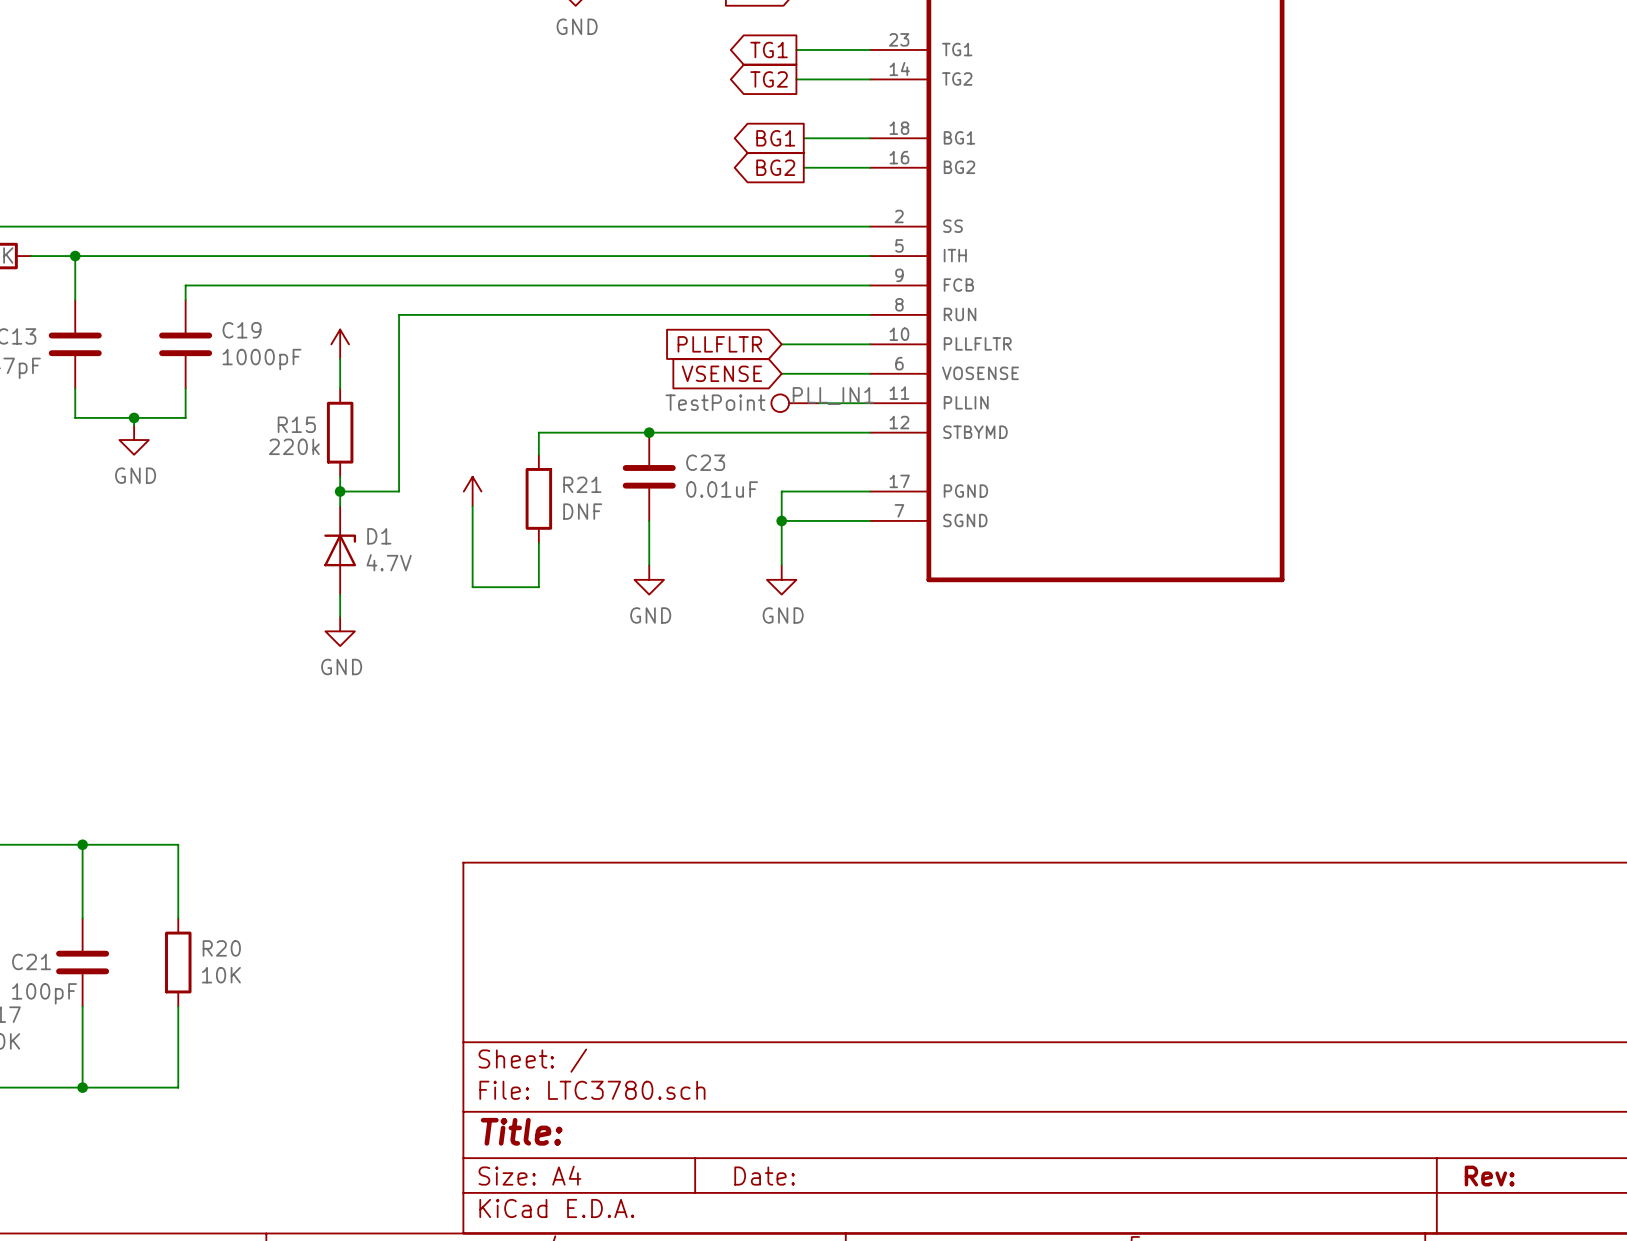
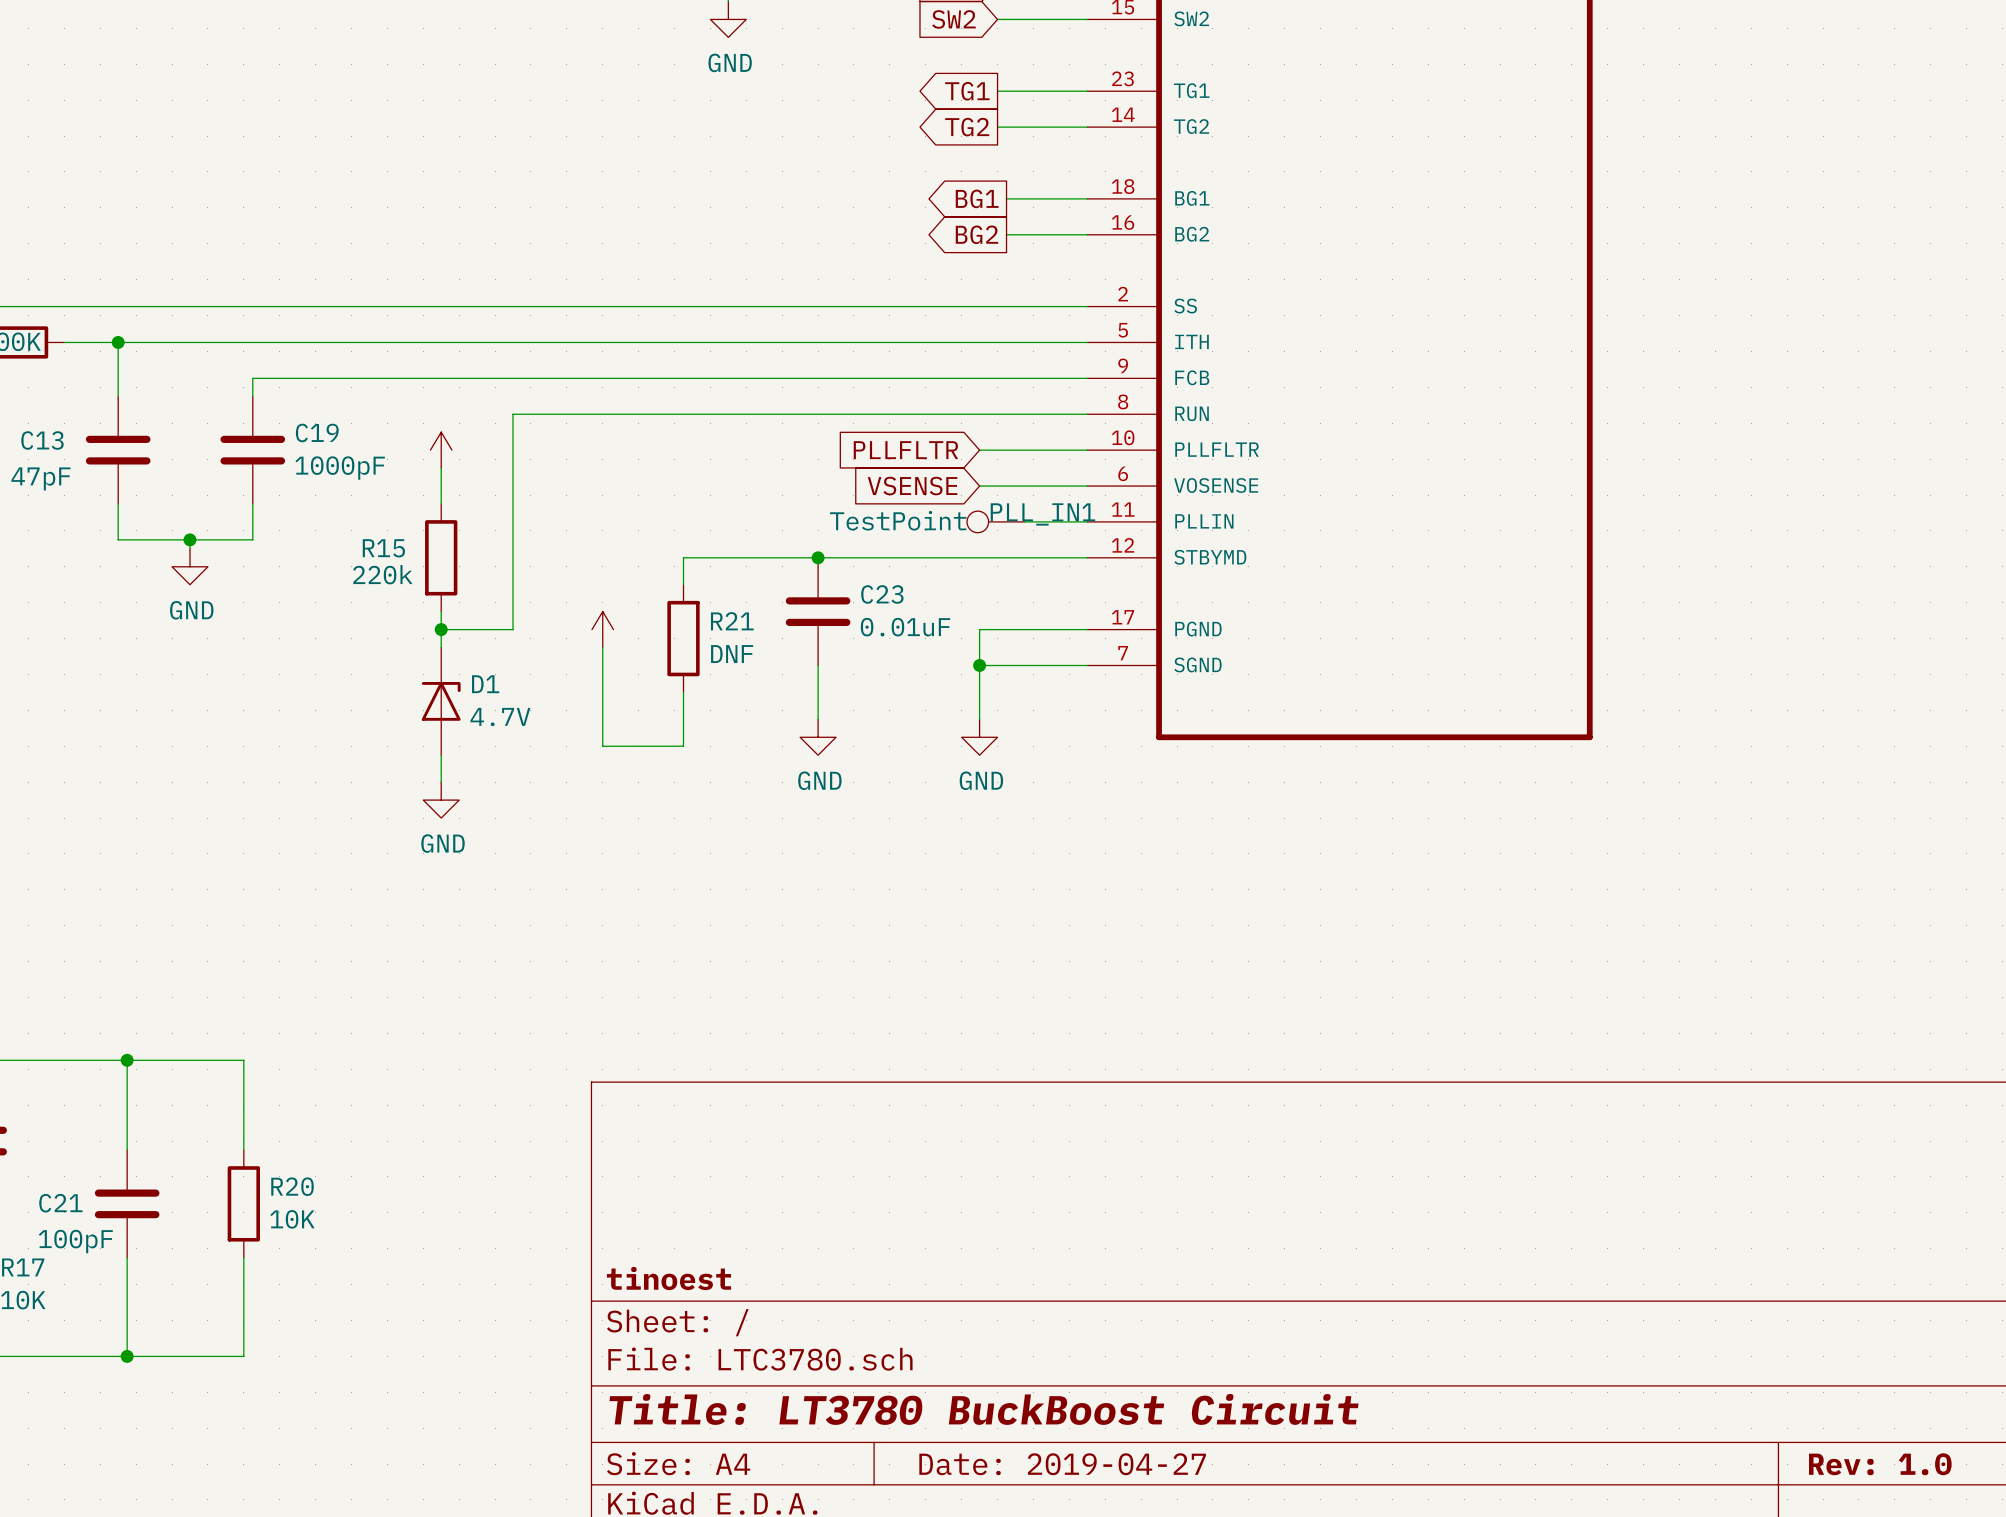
title block: none -> tinoest (668, 1278)
title block: Title: (521, 1131) -> Title: LT3780 BuckBoost Circuit (984, 1409)
title block: Date: (764, 1176) -> Date: 2019-04-27 (1062, 1464)
title block: Rev: (1489, 1176) -> Rev: 1.0 (1880, 1464)

